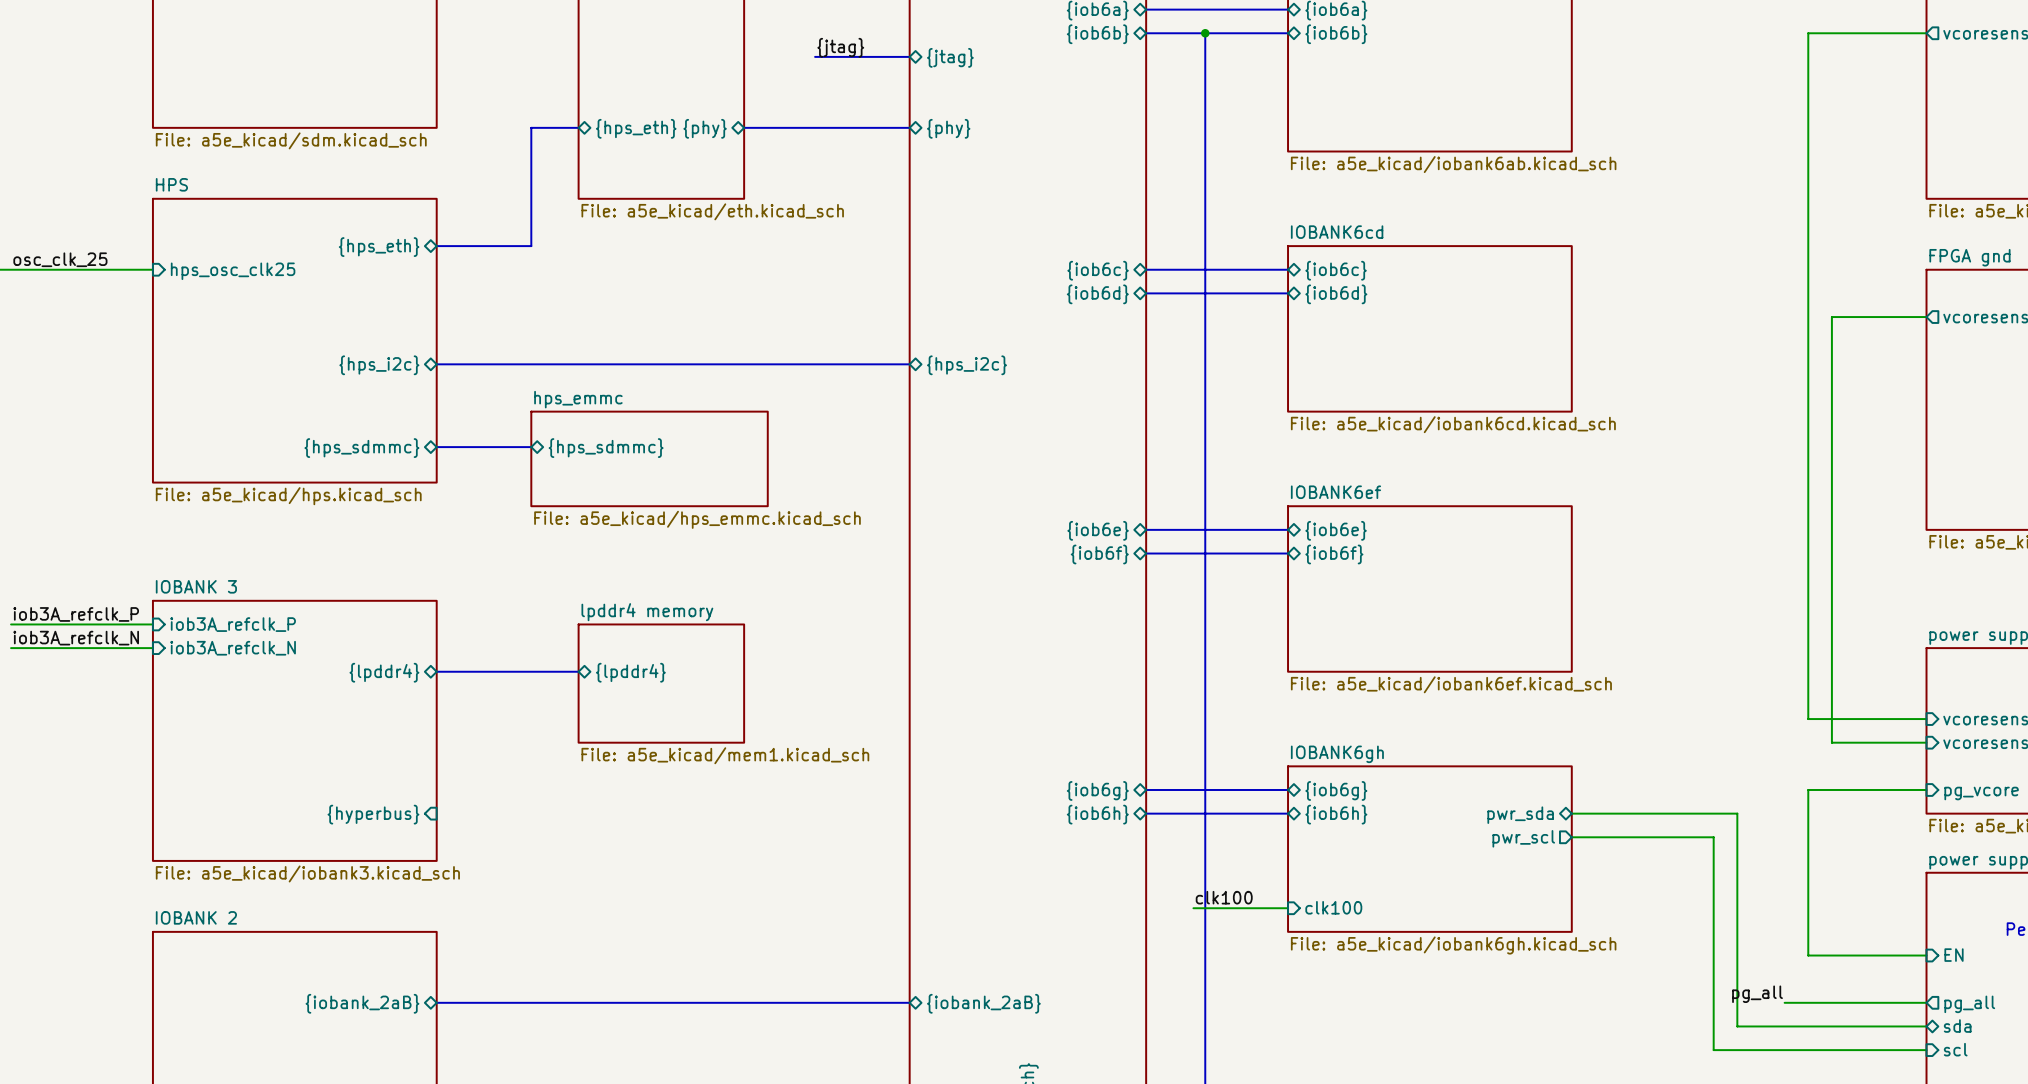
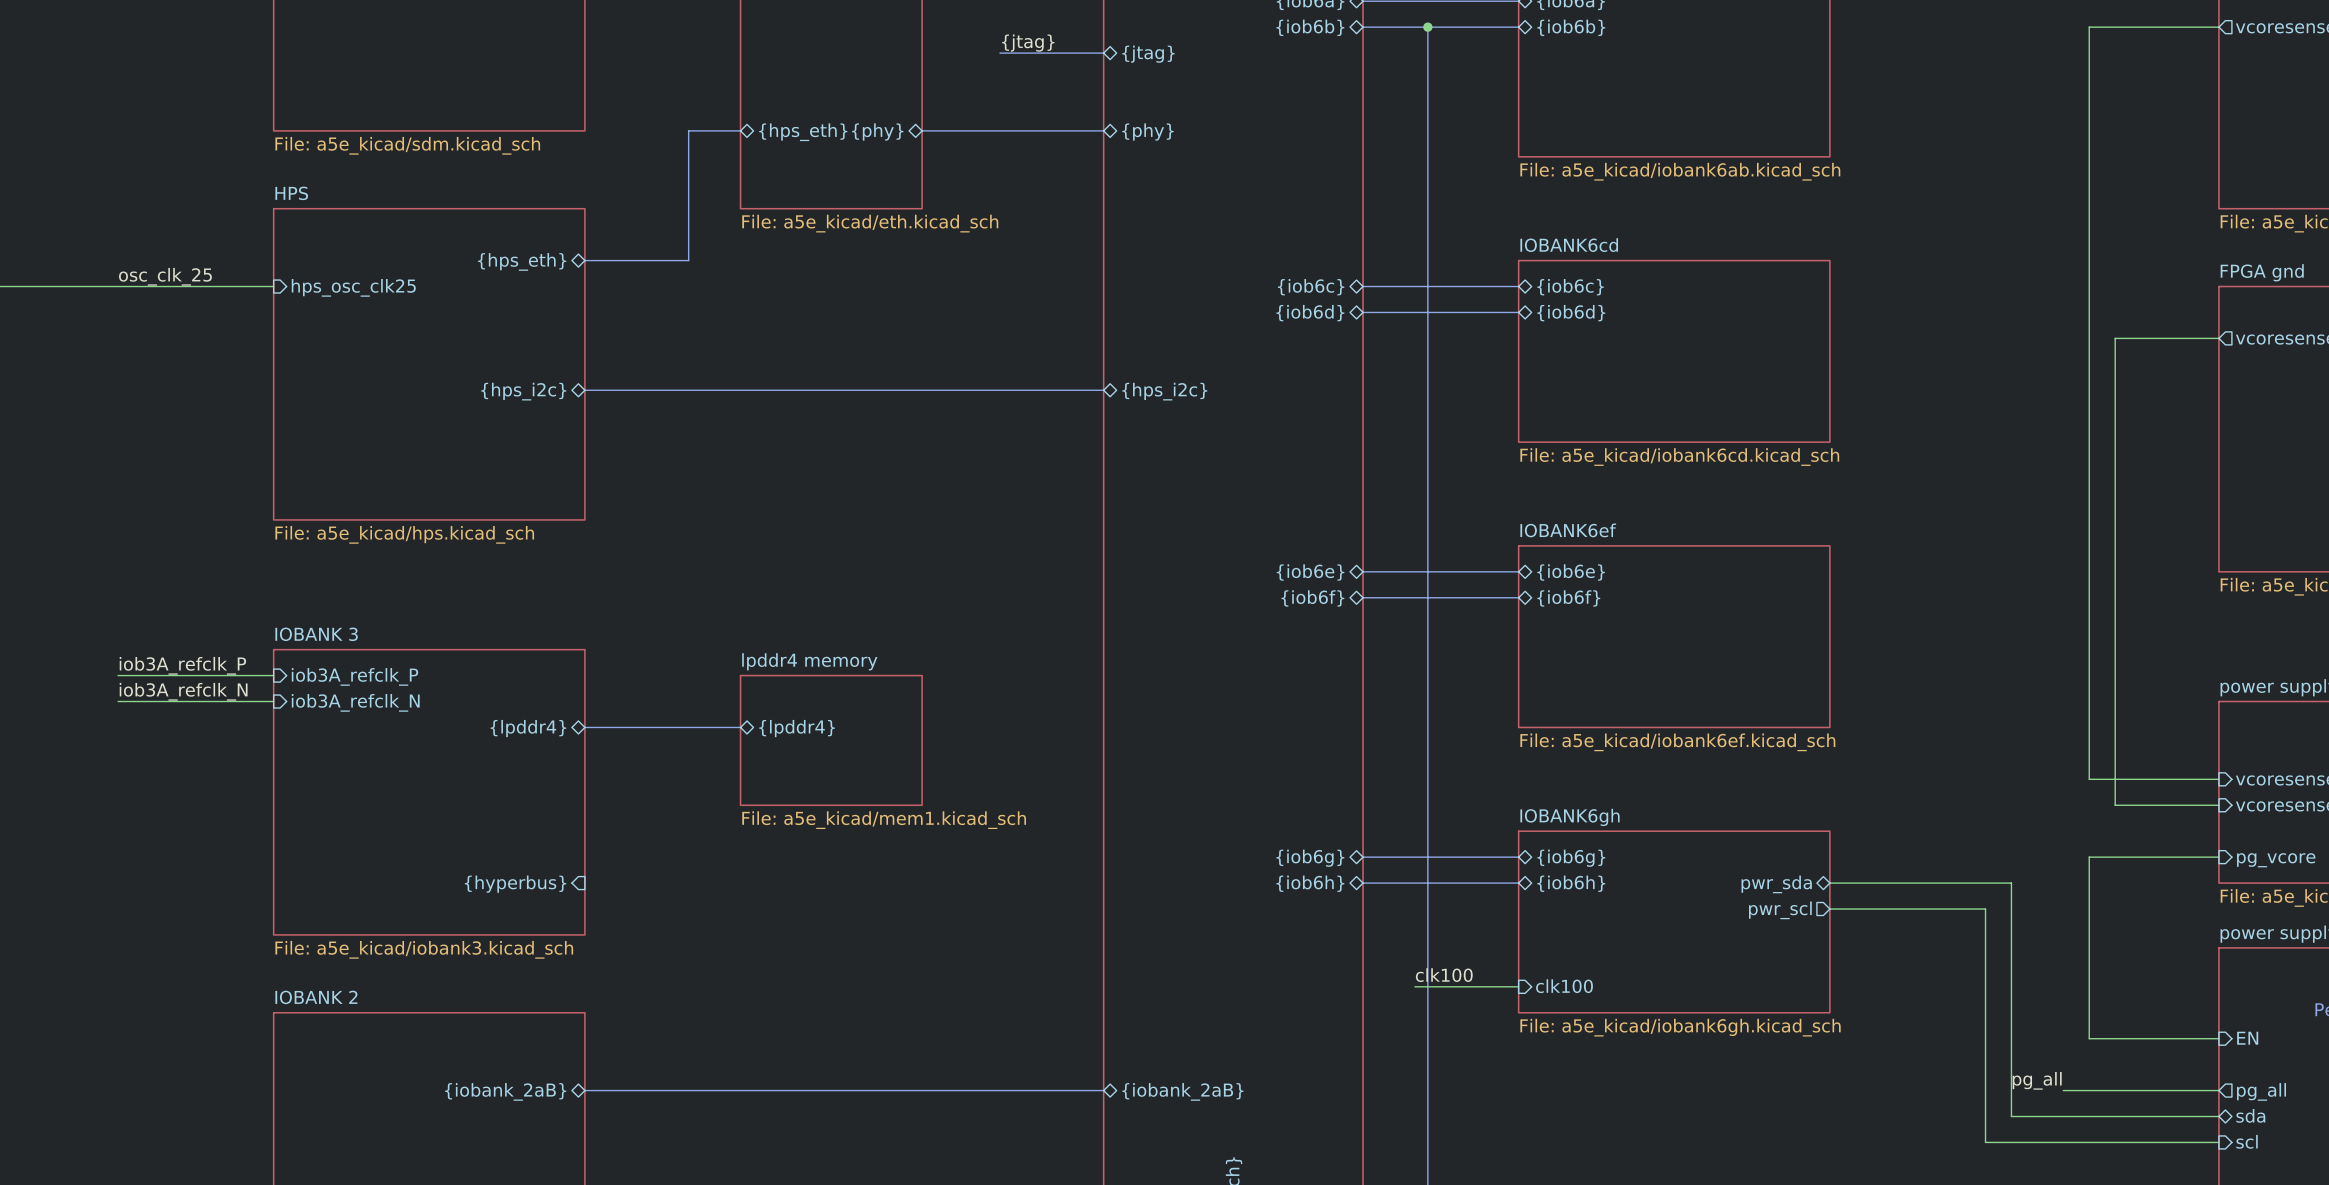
bus: (436, 447) (531, 447) -> none
sheet pin: {hps_sdmmc} (361, 448) -> none
sheet pin: {hps_sdmmc} (606, 448) -> none
sheet hps_emmc: File: a5e_kicad/hps_emmc.kicad_sch (649, 458) -> none

